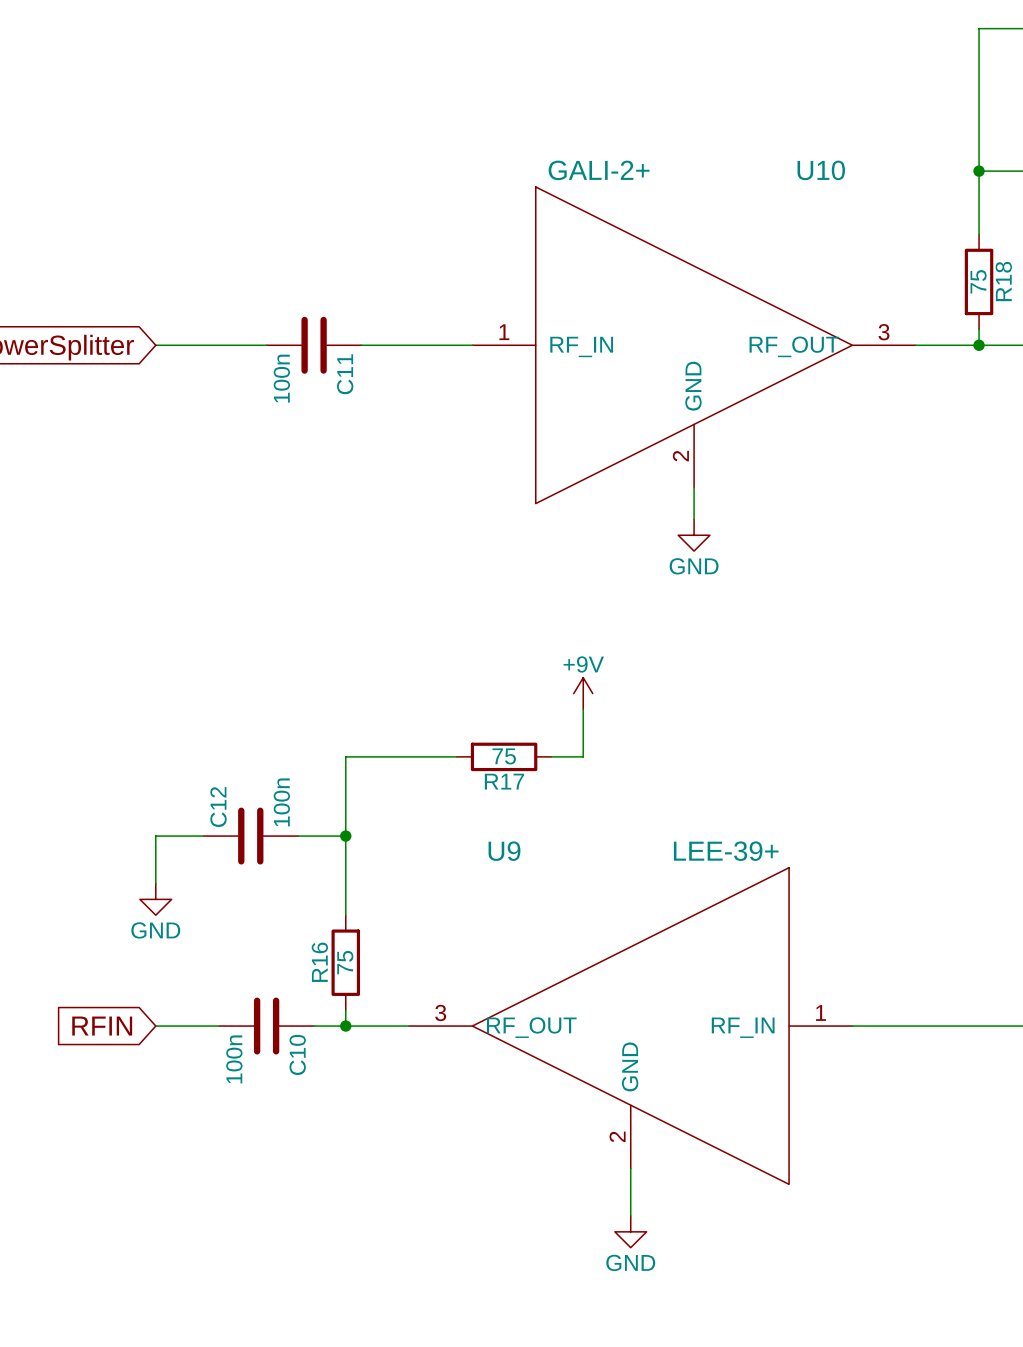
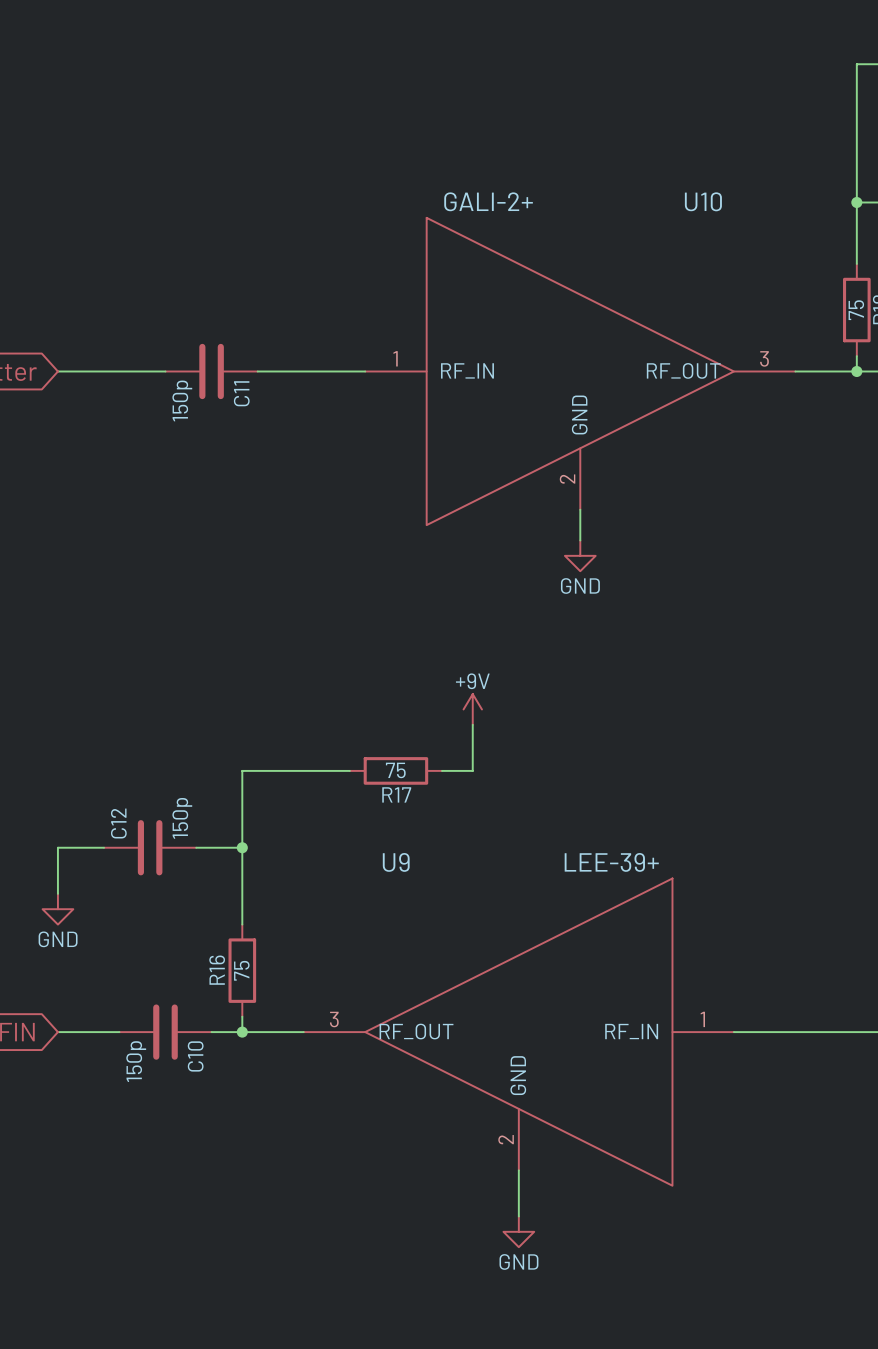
C11 value: 100n (281, 378) -> 150p (182, 400)
C12 value: 100n (281, 802) -> 150p (182, 818)
C10 value: 100n (234, 1059) -> 150p (136, 1061)

